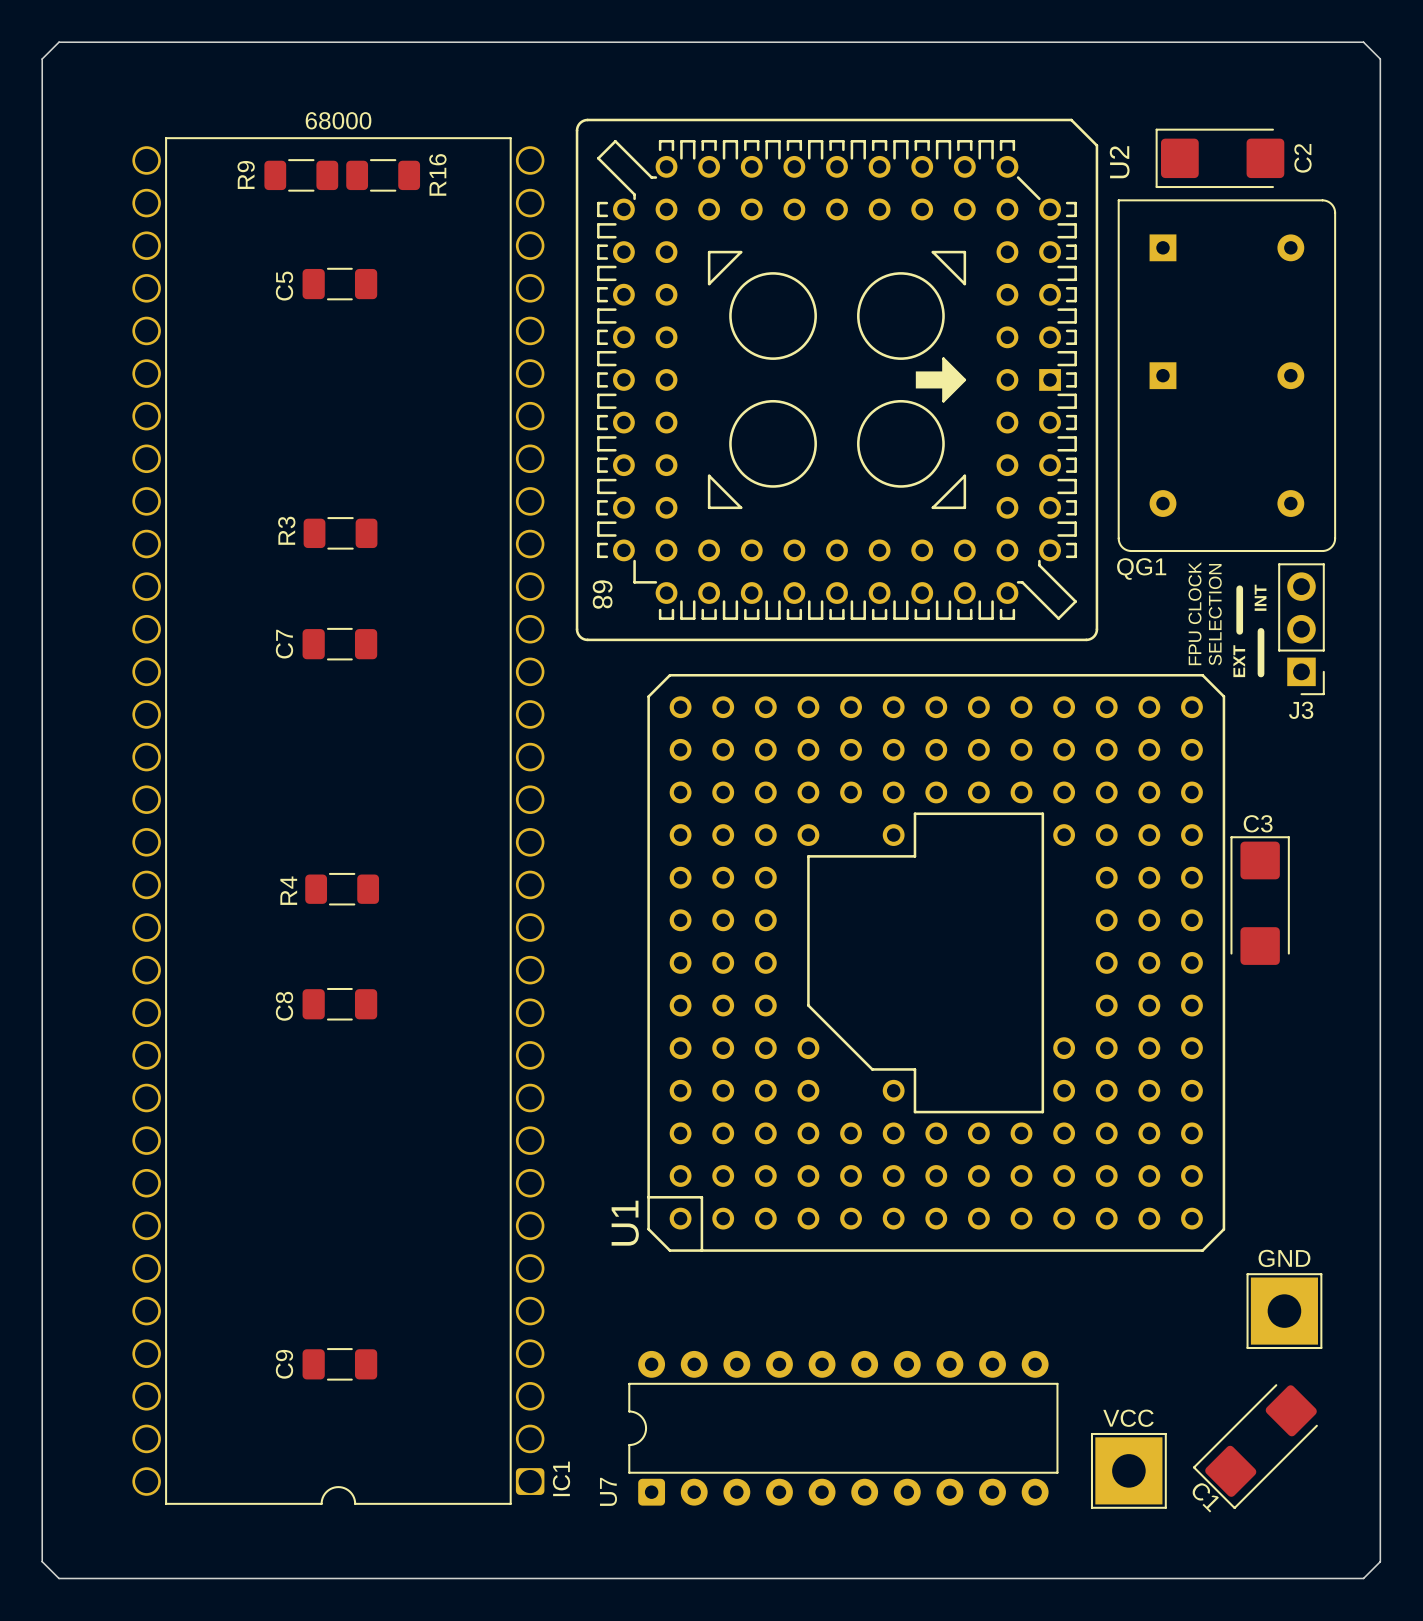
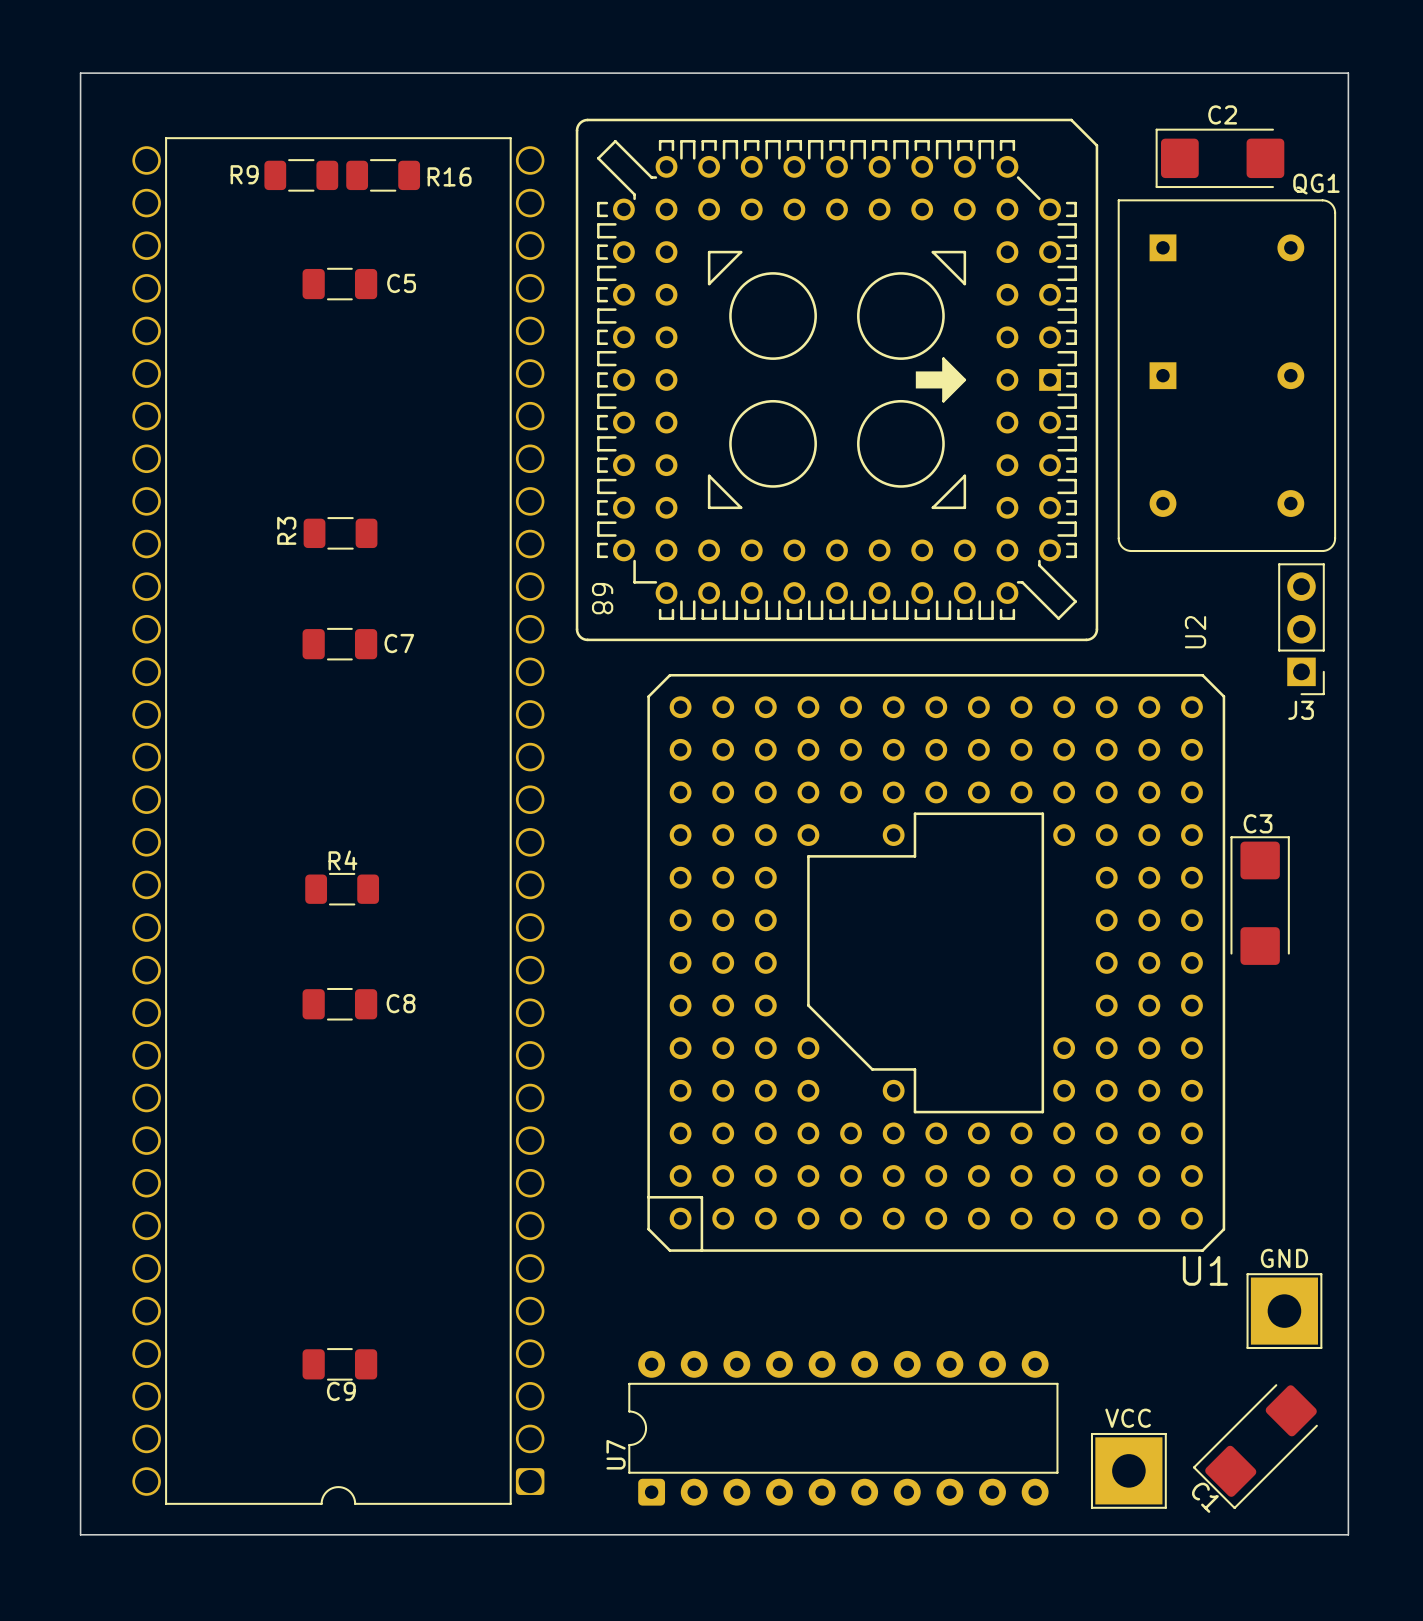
board edge: (58, 42) (1363, 42) (1380, 58) (1380, 1561) (1363, 1578) (58, 1578) (42, 1561) (42, 58) (58, 42) -> (80, 73) (80, 1534) (1348, 1534) (1348, 73) (80, 73)
IC1 value: 68000 (338, 120) -> none
C2 name rotation: 0° (1302, 158) -> 90° clockwise (1222, 114)
C2 name position: C2 (1302, 158) -> C2 (1222, 114)
U2 name position: U2 (1119, 162) -> U2 (1195, 632)
R9 name rotation: 0° (246, 174) -> 90° clockwise (244, 174)
R16 name rotation: 0° (437, 174) -> 90° clockwise (449, 176)
C5 name rotation: 0° (284, 286) -> 90° clockwise (401, 283)
C5 name position: C5 (284, 286) -> C5 (401, 283)
QG1 name position: QG1 (1141, 569) -> QG1 (1316, 184)
line: (1239, 588) (1239, 631) -> none
text: INT (1260, 597) -> none
text: FPU CLOCK (1195, 613) -> none
text: SELECTION (1215, 614) -> none
line: (1261, 631) (1261, 673) -> none
C7 name rotation: 0° (284, 644) -> 90° clockwise (399, 643)
C7 name position: C7 (284, 644) -> C7 (399, 643)
text: EXT (1239, 661) -> none
R4 name rotation: 0° (288, 890) -> 90° clockwise (342, 860)
R4 name position: R4 (288, 890) -> R4 (342, 860)
C8 name rotation: 0° (284, 1006) -> 90° clockwise (401, 1003)
C8 name position: C8 (284, 1006) -> C8 (401, 1003)
U1 name rotation: 0° (625, 1223) -> 90° clockwise (1205, 1270)
U1 name position: U1 (625, 1223) -> U1 (1205, 1270)
C9 name rotation: 0° (284, 1364) -> 90° clockwise (341, 1391)
C9 name position: C9 (284, 1364) -> C9 (341, 1391)
IC1 name: IC1 (561, 1478) -> none
U7 name position: U7 (608, 1491) -> U7 (616, 1454)

